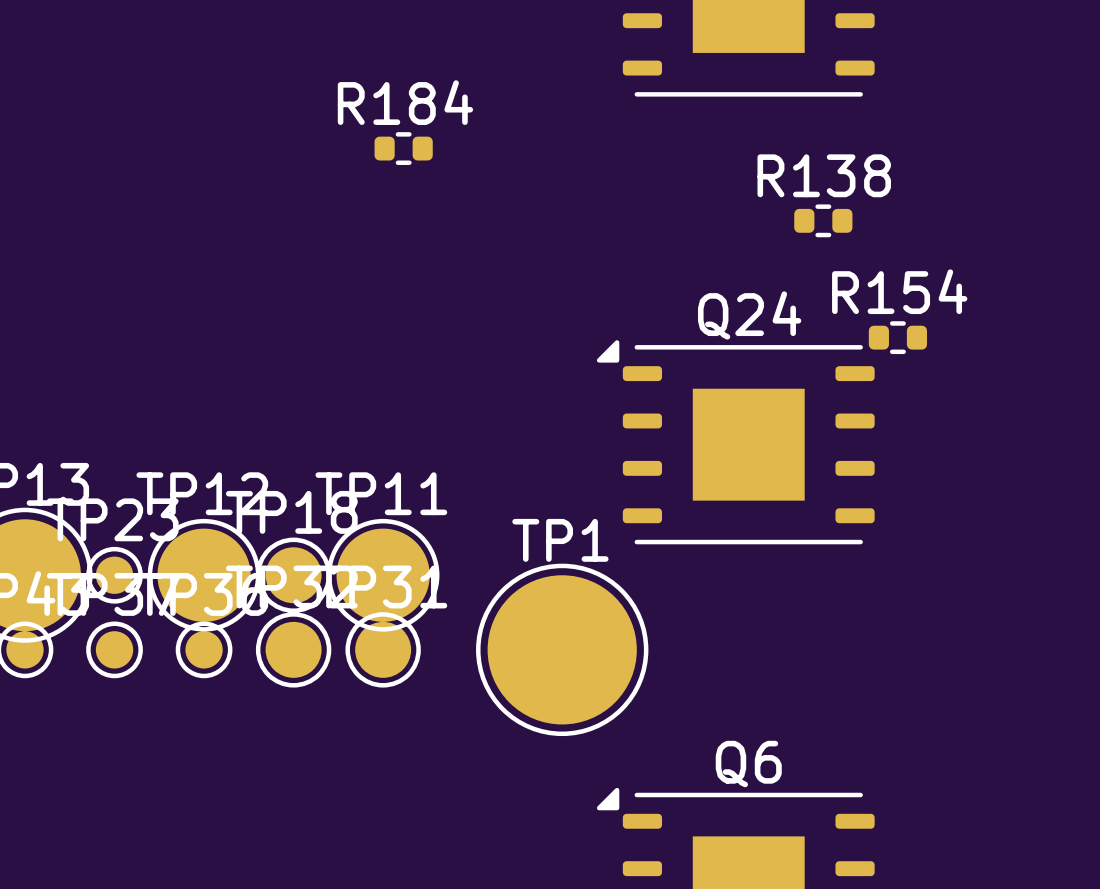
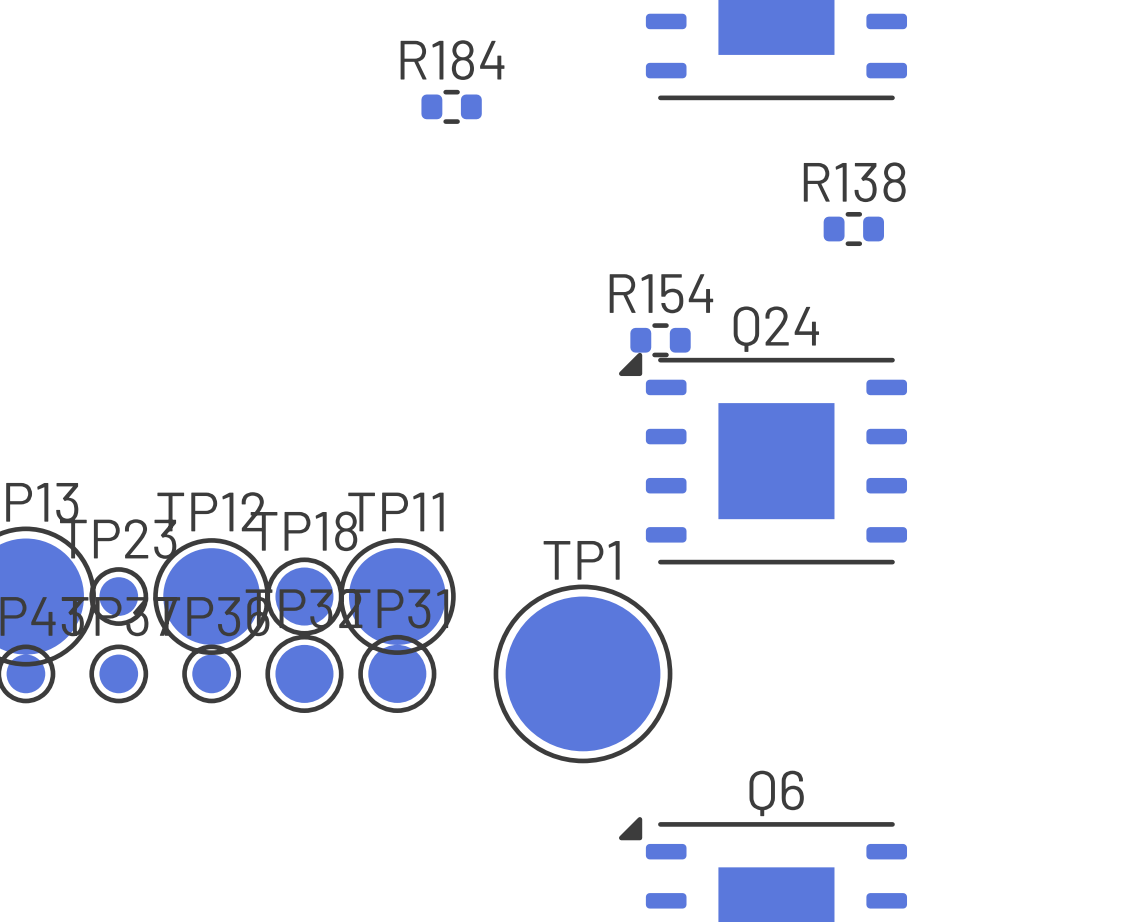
R184 position: (403, 148) -> (451, 106)
R154 position: (897, 337) -> (660, 340)

